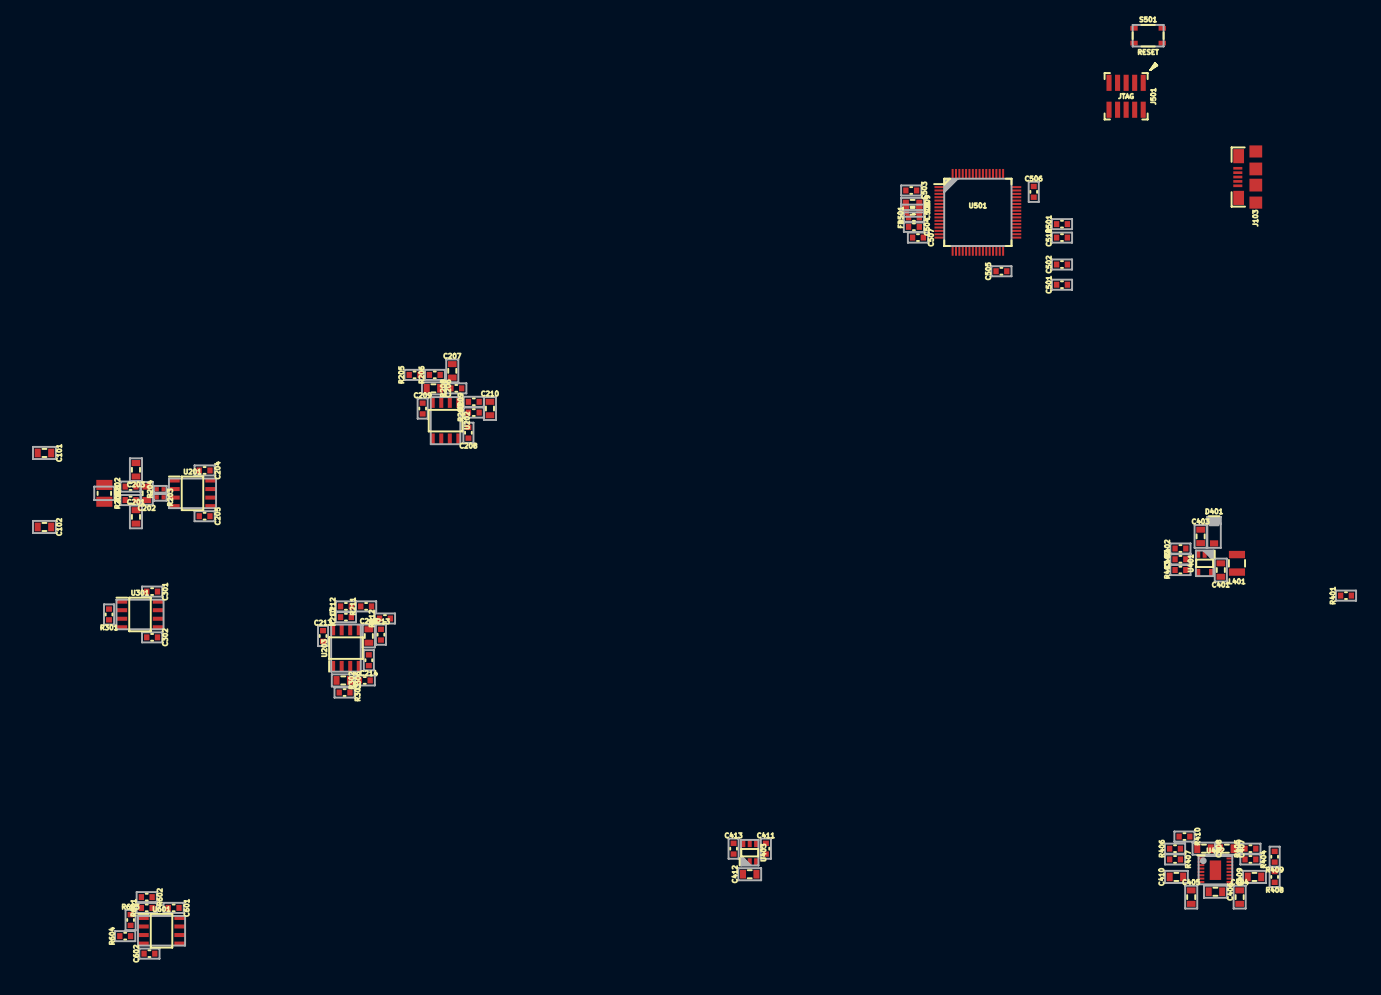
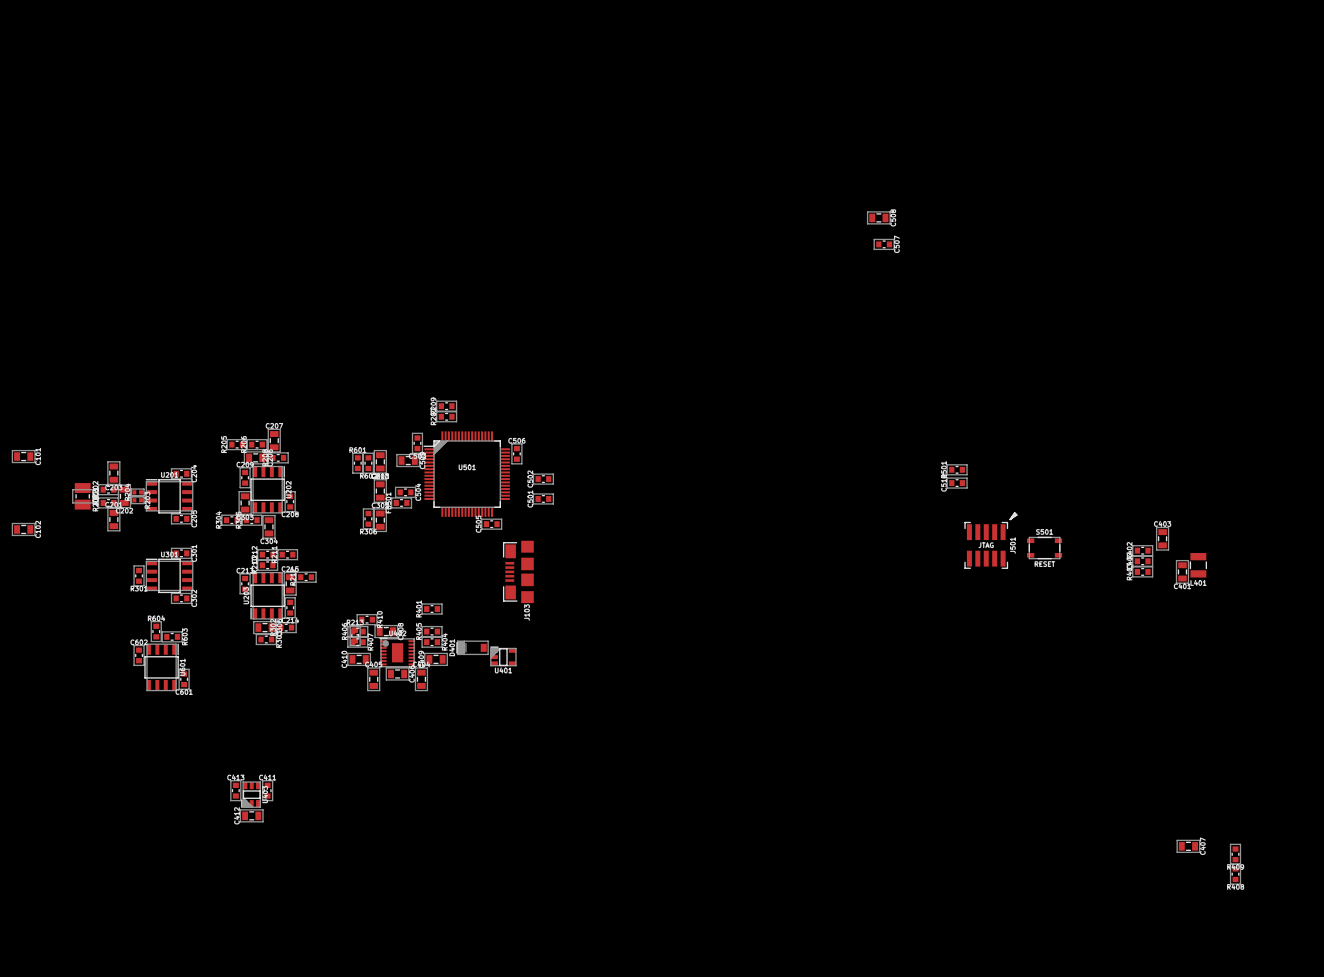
part position: (1148, 35) -> (1044, 548)
part position: (1130, 91) -> (990, 540)
part position: (1246, 177) -> (518, 571)
part rotation: 0° (911, 190) -> 90° clockwise (417, 443)
part position: (911, 190) -> (417, 443)
part position: (1033, 191) -> (516, 453)
part position: (912, 203) -> (408, 460)
part position: (977, 212) -> (466, 474)
part position: (913, 217) -> (401, 502)
part position: (1061, 224) -> (957, 469)
part position: (913, 226) -> (405, 492)
part position: (1061, 237) -> (957, 483)
part position: (1061, 264) -> (543, 479)
part position: (1001, 271) -> (491, 524)
part position: (1061, 284) -> (543, 498)
part position: (452, 370) -> (274, 440)
part position: (414, 374) -> (237, 444)
part position: (434, 374) -> (257, 444)
part position: (433, 388) -> (255, 457)
part position: (456, 388) -> (278, 457)
part position: (422, 408) -> (245, 477)
part position: (489, 408) -> (380, 491)
part position: (445, 420) -> (267, 489)
part position: (468, 432) -> (290, 501)
part: none -> (380, 461)
part: none -> (245, 502)
part: none -> (368, 518)
part: none -> (231, 520)
part: none -> (251, 520)
part: none -> (380, 520)
part: none -> (268, 526)
part rotation: 0° (1214, 531) -> 90° counterclockwise (472, 647)
part position: (1214, 531) -> (472, 647)
part rotation: 0° (1205, 563) -> 90° counterclockwise (503, 656)
part position: (1205, 563) -> (503, 656)
part position: (152, 591) -> (181, 553)
part position: (1345, 595) -> (432, 609)
part position: (345, 606) -> (267, 554)
part position: (366, 606) -> (287, 554)
part position: (109, 614) -> (139, 575)
part position: (139, 614) -> (169, 575)
part position: (345, 617) -> (267, 565)
part position: (384, 618) -> (306, 577)
part position: (323, 636) -> (245, 583)
part position: (368, 636) -> (290, 583)
part position: (152, 637) -> (181, 598)
part position: (345, 648) -> (267, 595)
part position: (368, 660) -> (290, 607)
part position: (343, 680) -> (264, 627)
part position: (364, 680) -> (286, 627)
part position: (344, 692) -> (266, 639)
part position: (1184, 836) -> (367, 619)
part position: (733, 848) -> (235, 790)
part position: (765, 848) -> (267, 790)
part position: (1175, 848) -> (357, 631)
part position: (1203, 848) -> (386, 631)
part position: (1250, 848) -> (432, 631)
part position: (748, 852) -> (250, 794)
part position: (1175, 859) -> (357, 642)
part position: (1250, 859) -> (432, 642)
part position: (1214, 869) -> (397, 652)
part position: (749, 874) -> (251, 815)
part position: (1176, 876) -> (359, 659)
part position: (1254, 876) -> (436, 659)
part position: (1215, 891) -> (397, 673)
part rotation: 0° (146, 897) -> 90° clockwise (368, 463)
part position: (146, 897) -> (368, 463)
part position: (1191, 897) -> (373, 679)
part position: (1239, 897) -> (421, 679)
part rotation: 0° (146, 907) -> 90° clockwise (357, 463)
part position: (146, 907) -> (357, 463)
part rotation: 0° (173, 907) -> 90° clockwise (184, 679)
part position: (173, 907) -> (184, 679)
part rotation: 0° (130, 920) -> 90° clockwise (172, 636)
part position: (130, 920) -> (172, 636)
part rotation: 0° (161, 930) -> 90° clockwise (161, 667)
part position: (161, 930) -> (161, 667)
part rotation: 0° (125, 936) -> 90° clockwise (156, 631)
part position: (125, 936) -> (156, 631)
part rotation: 0° (149, 953) -> 90° clockwise (139, 655)
part position: (149, 953) -> (139, 655)

